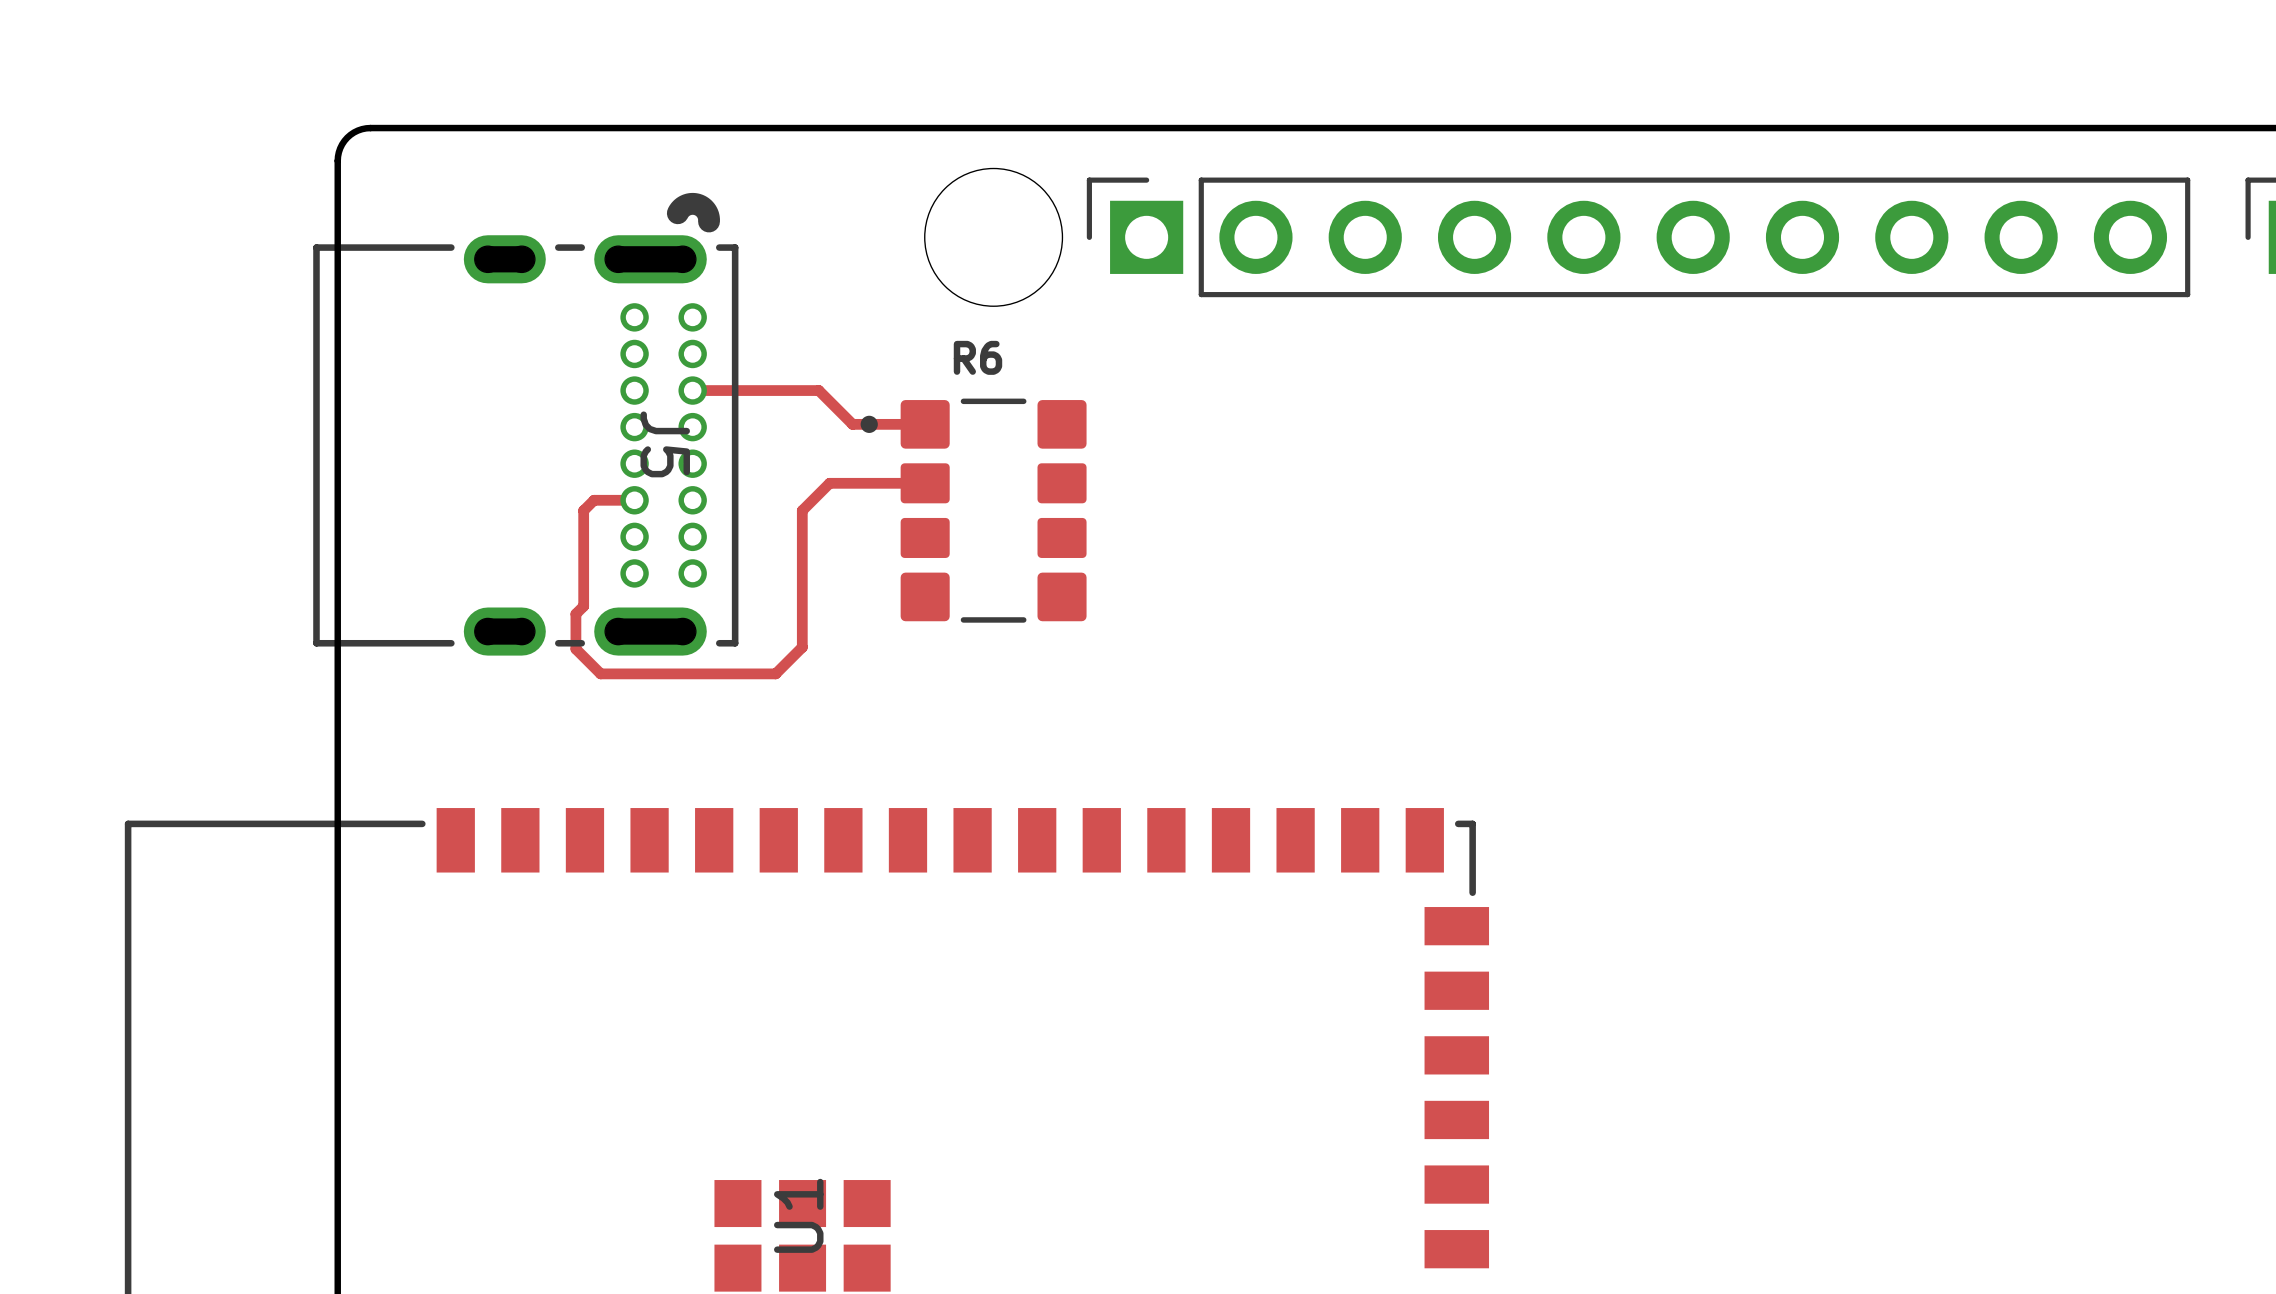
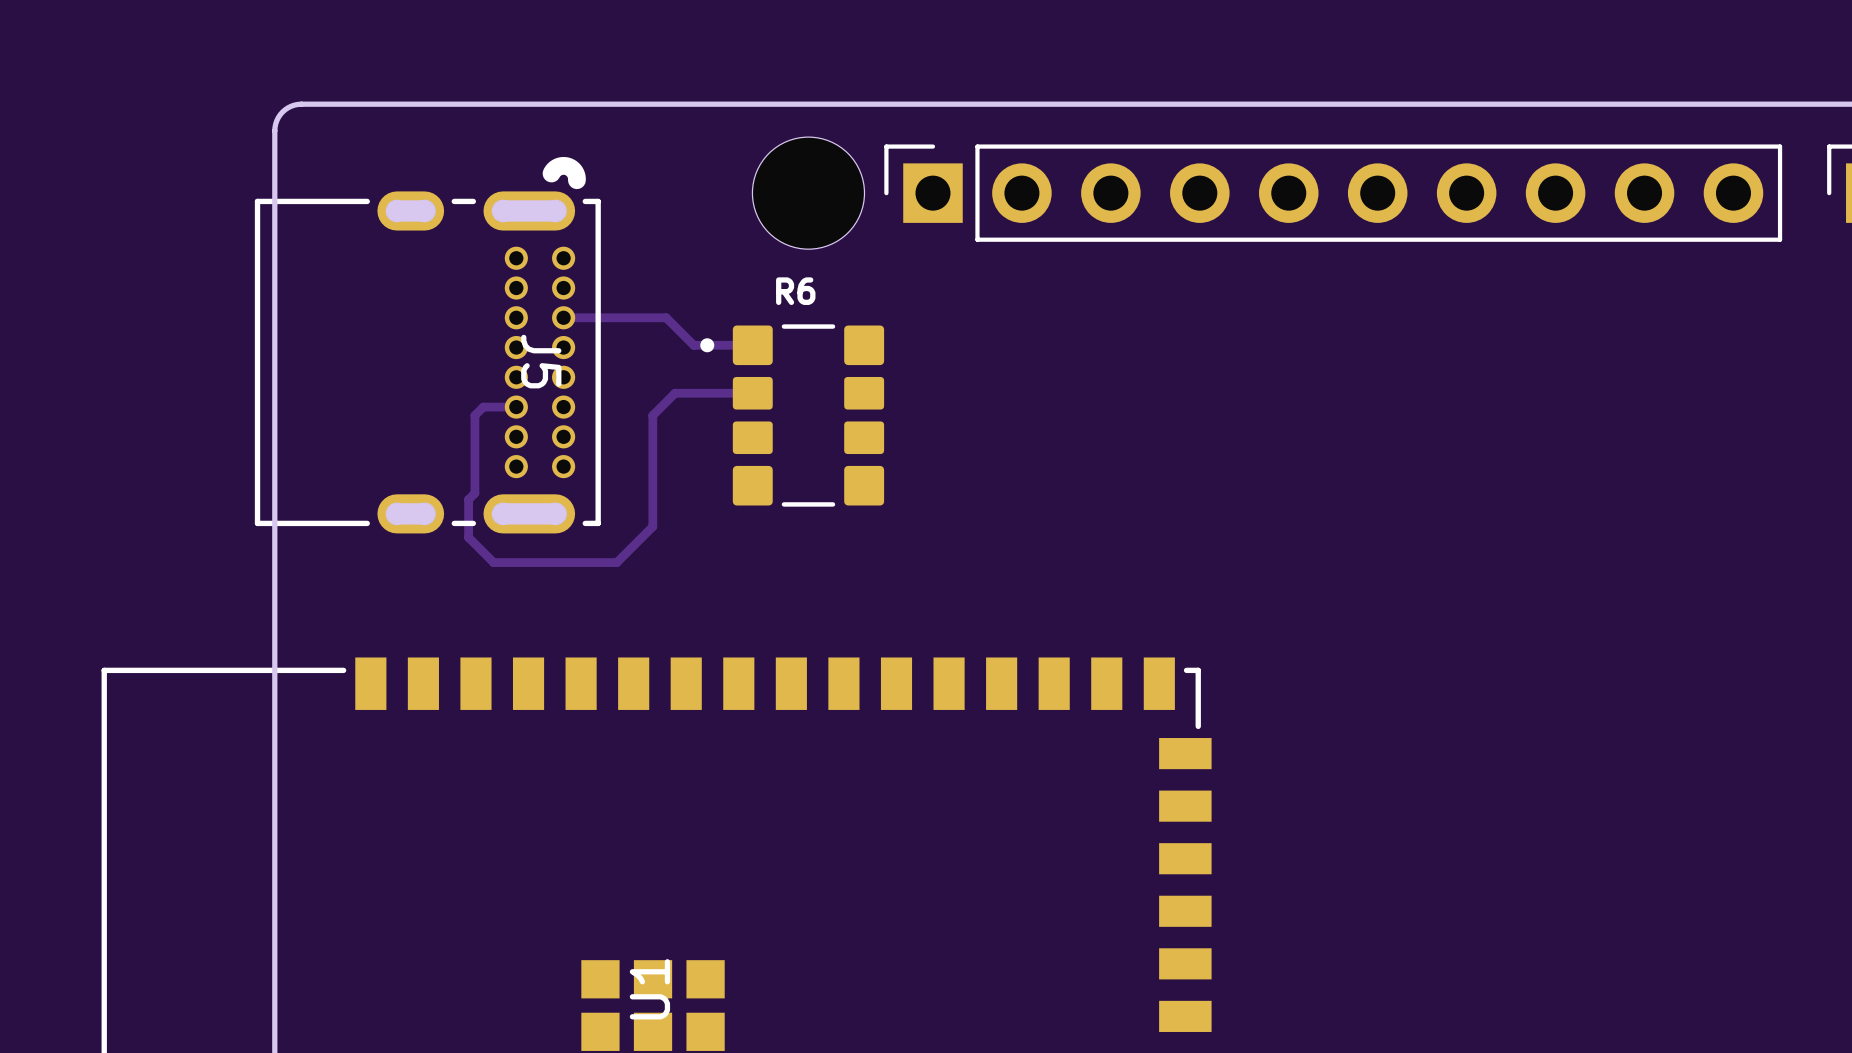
track: (575, 649) (600, 673) (775, 673) -> (468, 528) (468, 537) (493, 562) (616, 562) (631, 548)

